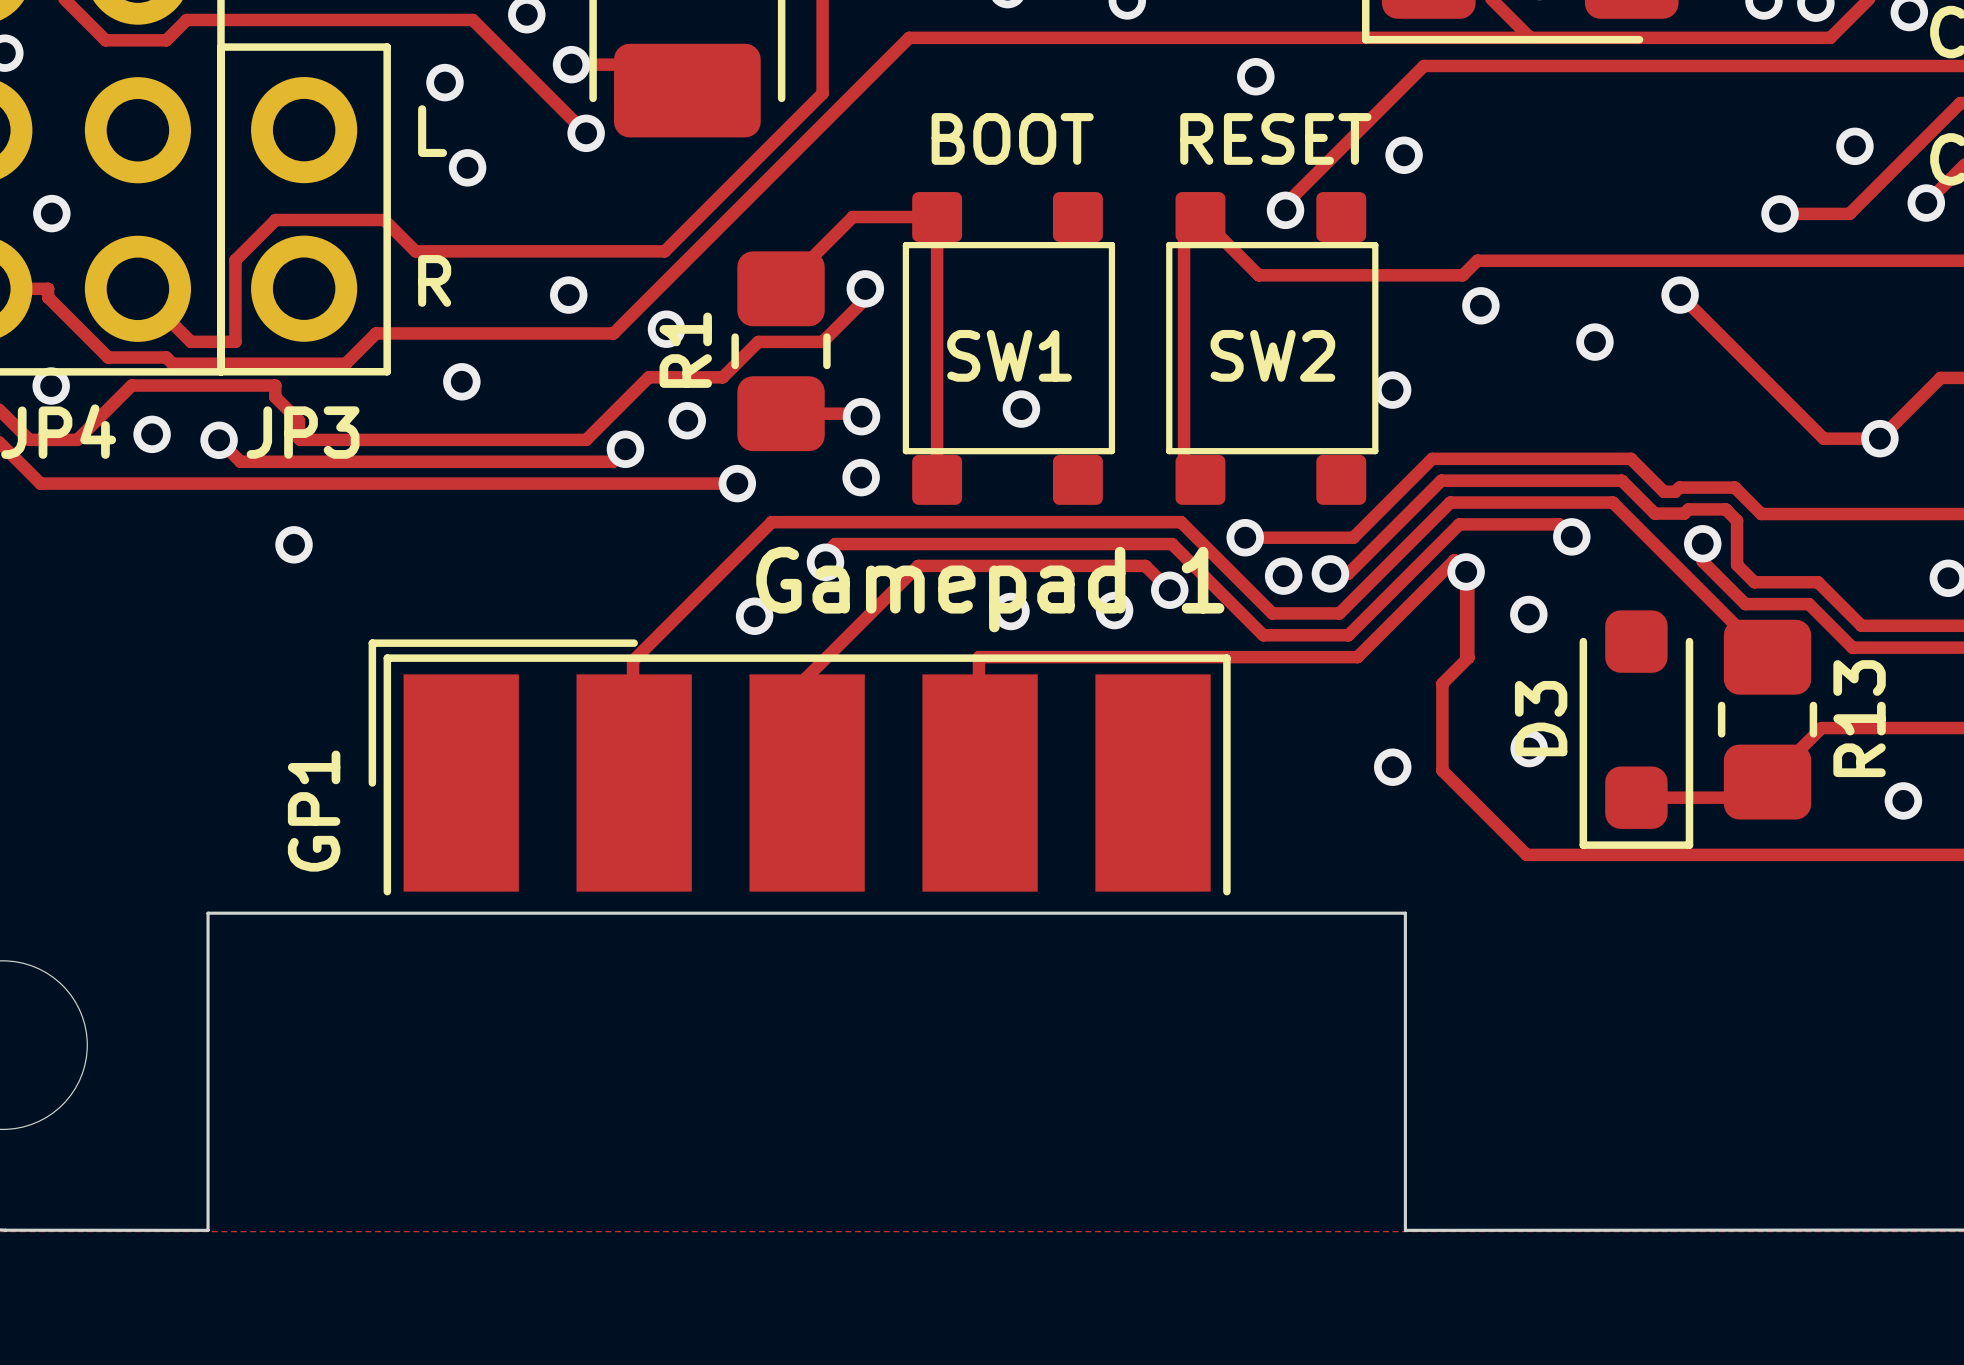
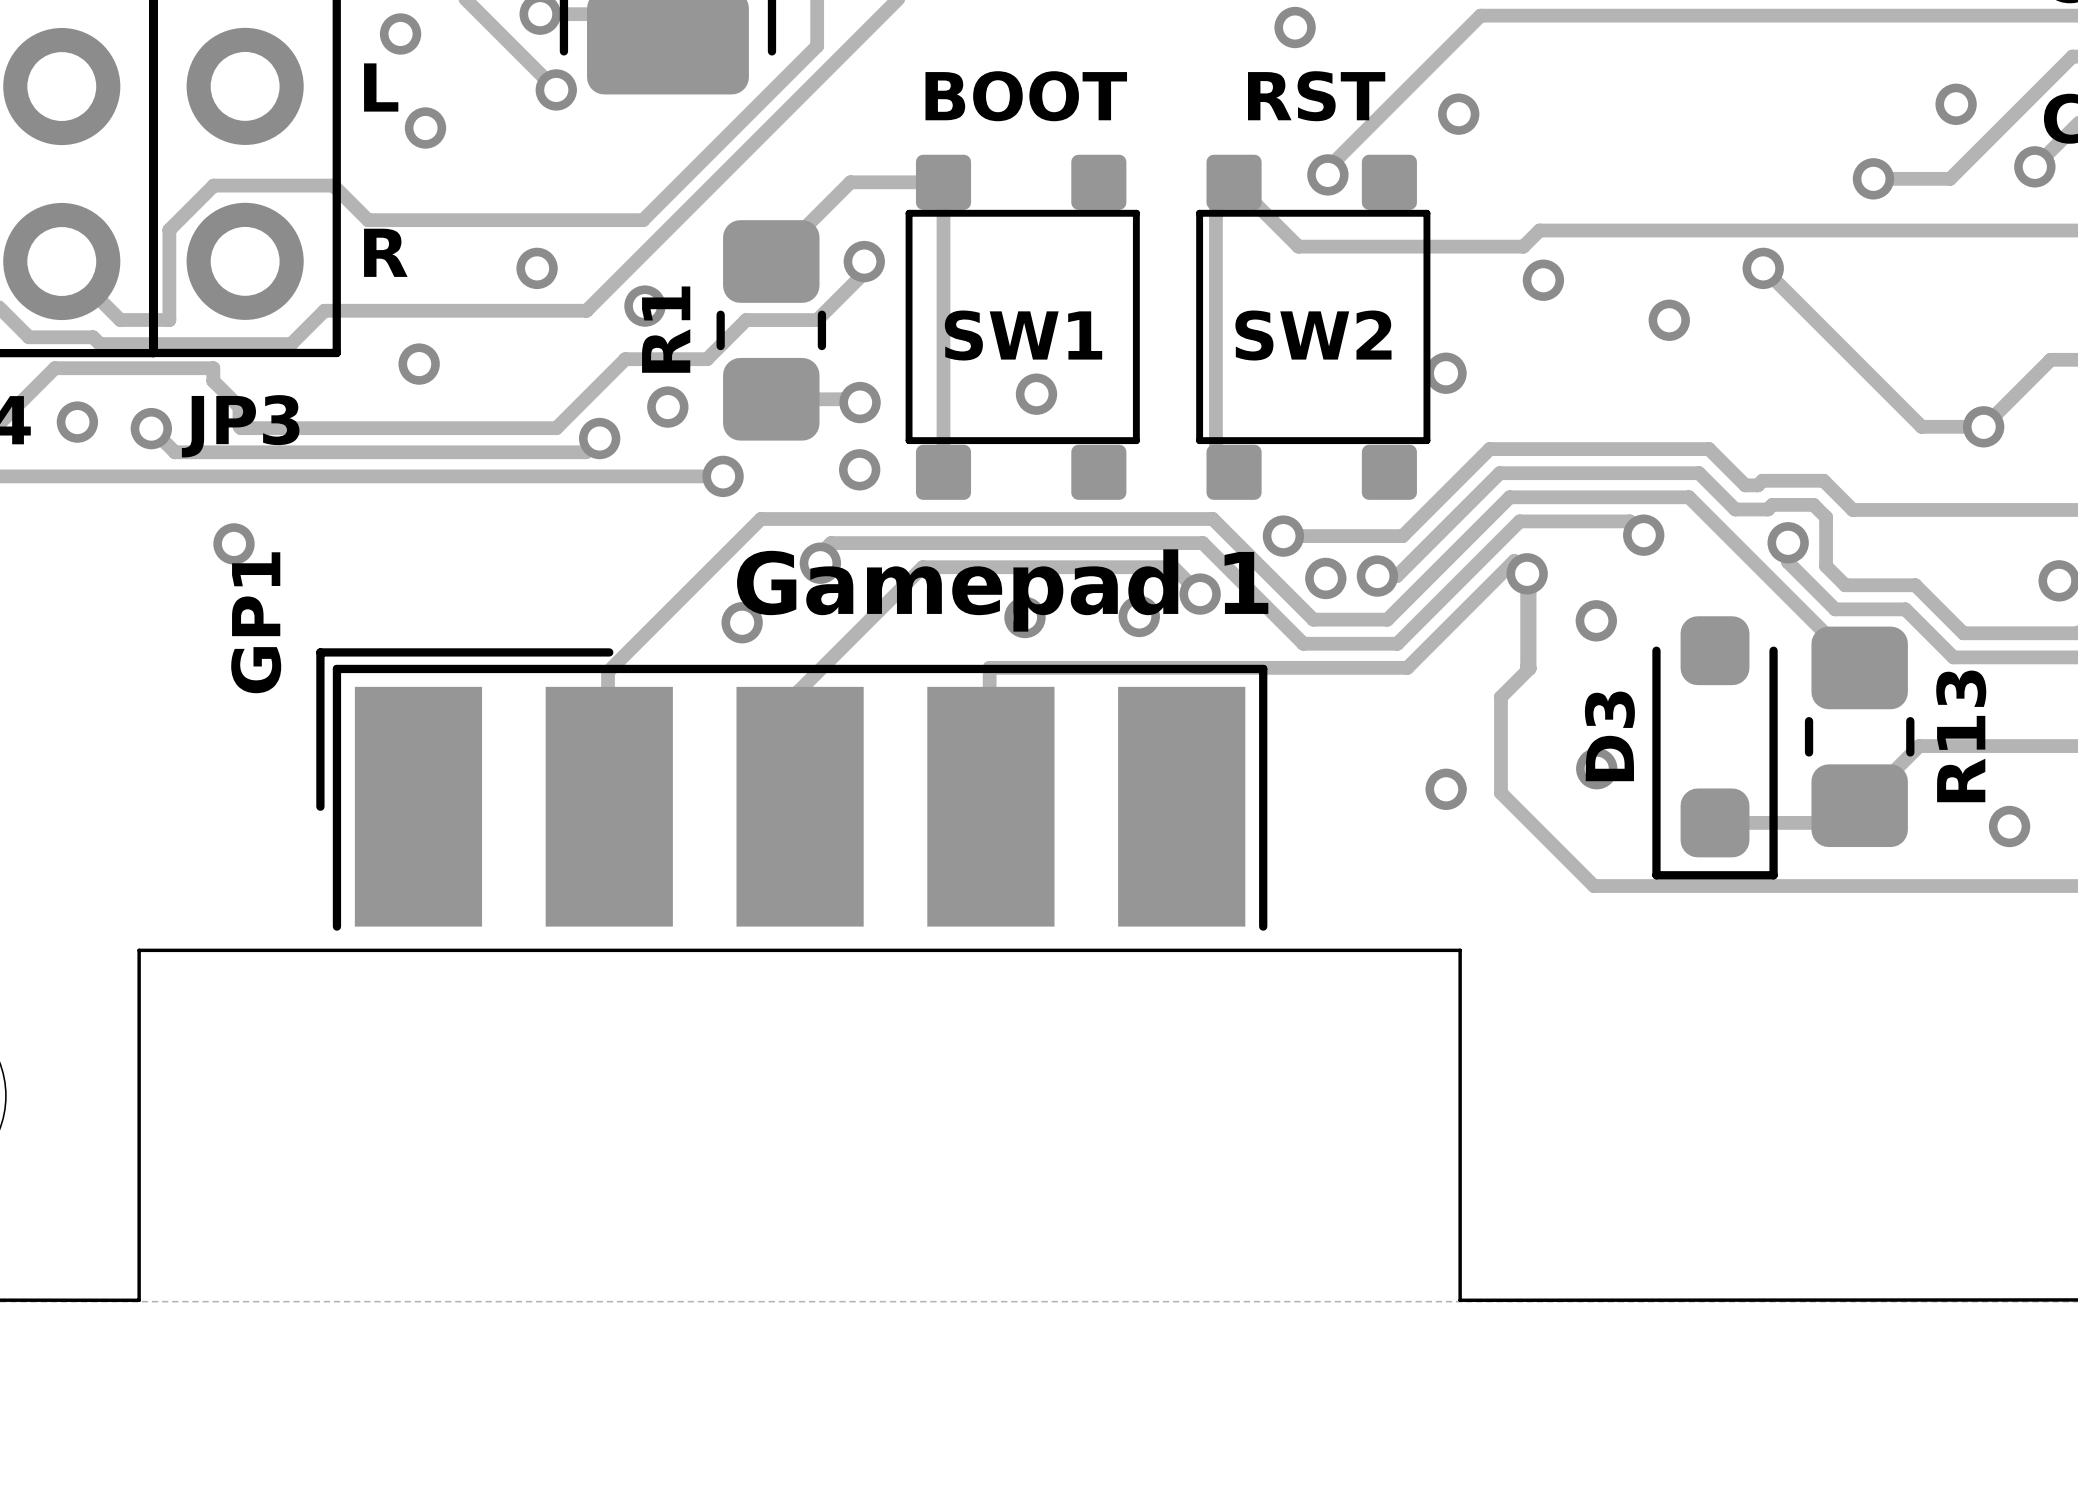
text: RESET (1275, 138) -> RST (1316, 96)
GP1 name position: GP1 (314, 811) -> GP1 (256, 622)

